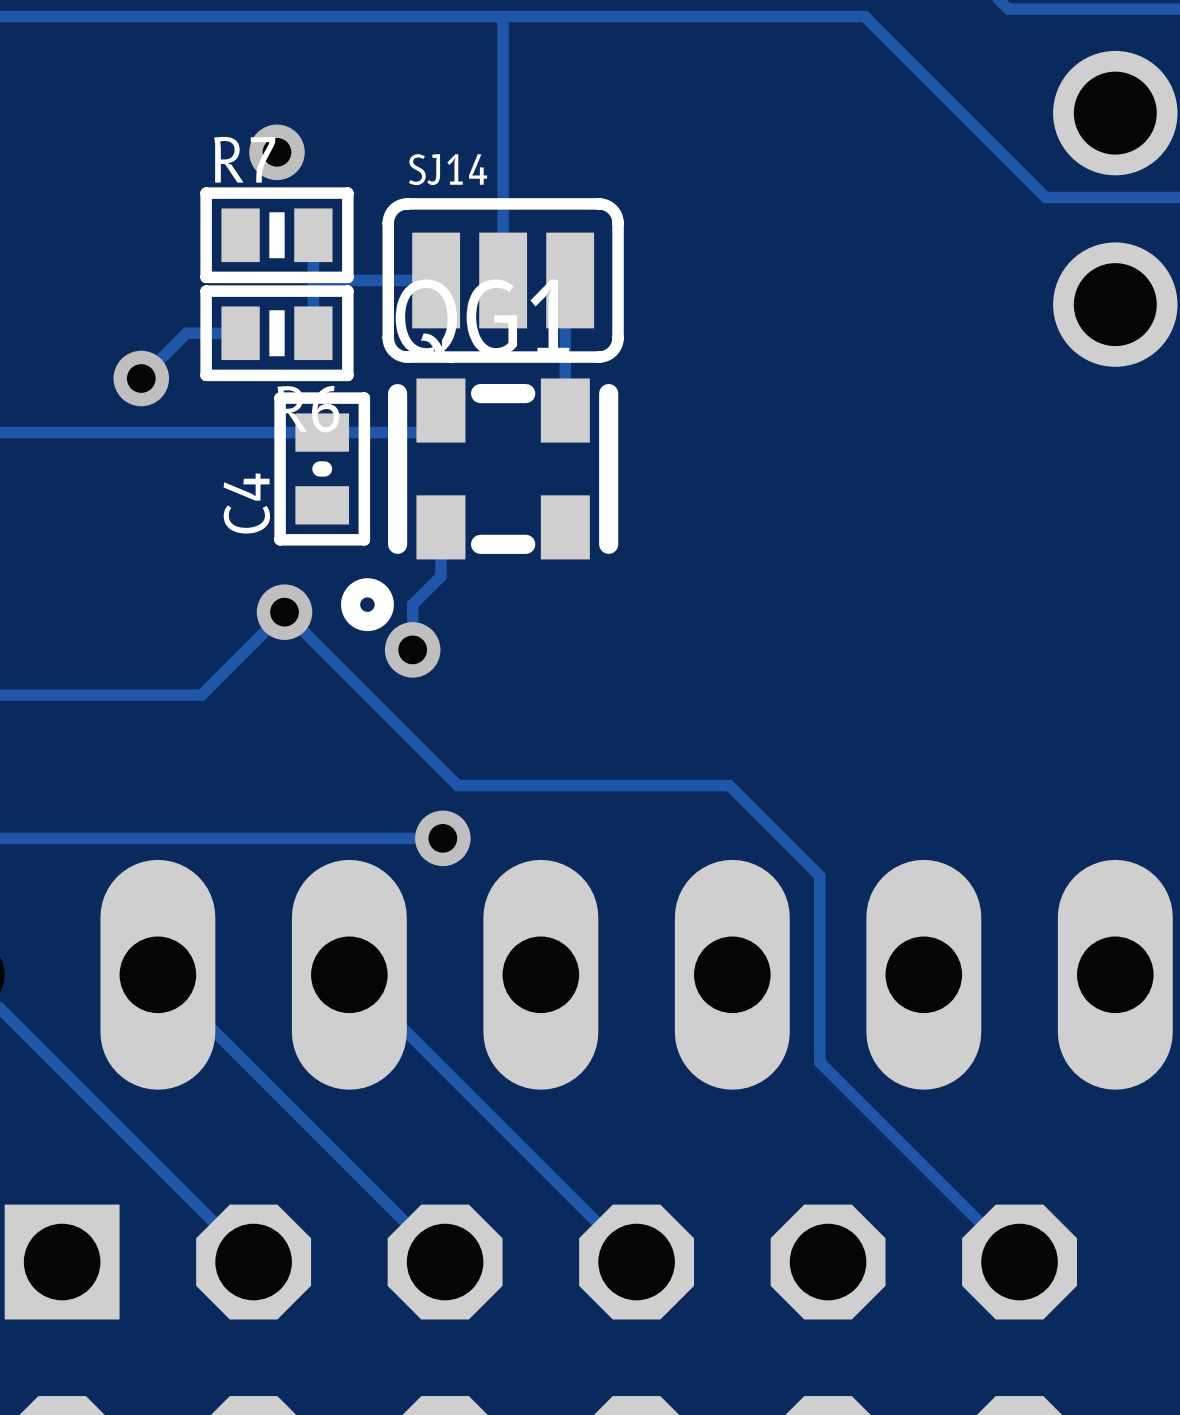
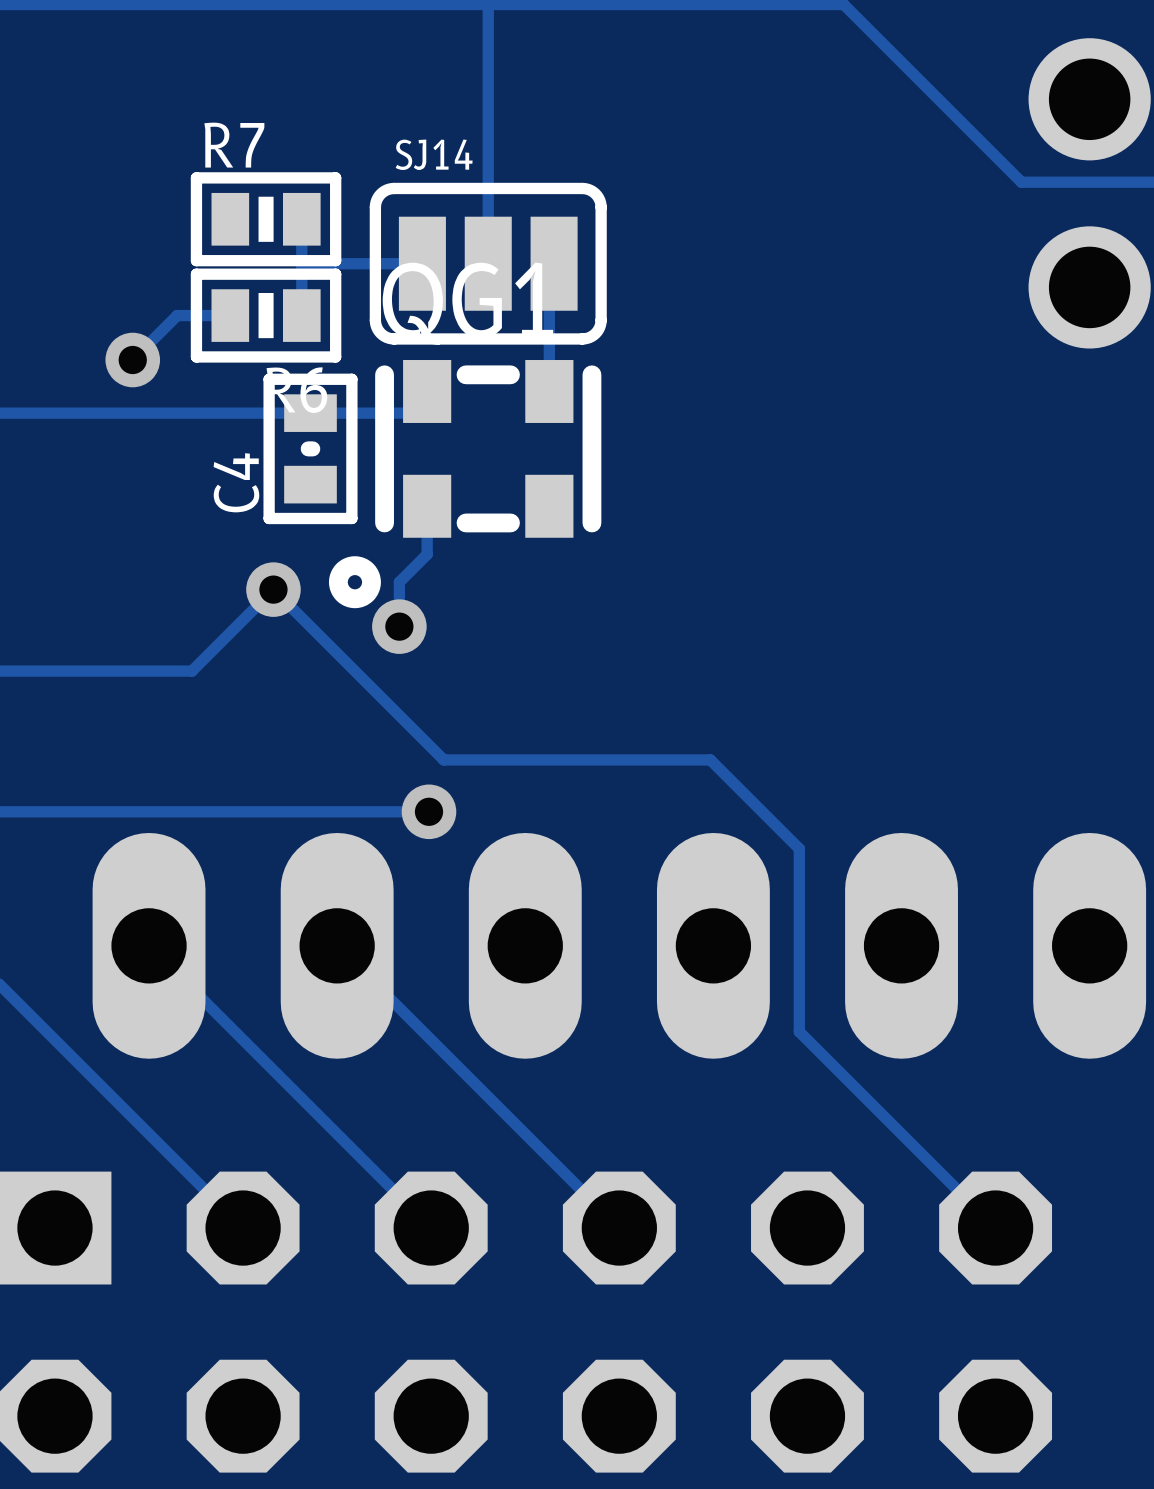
via: (276, 152) -> none

